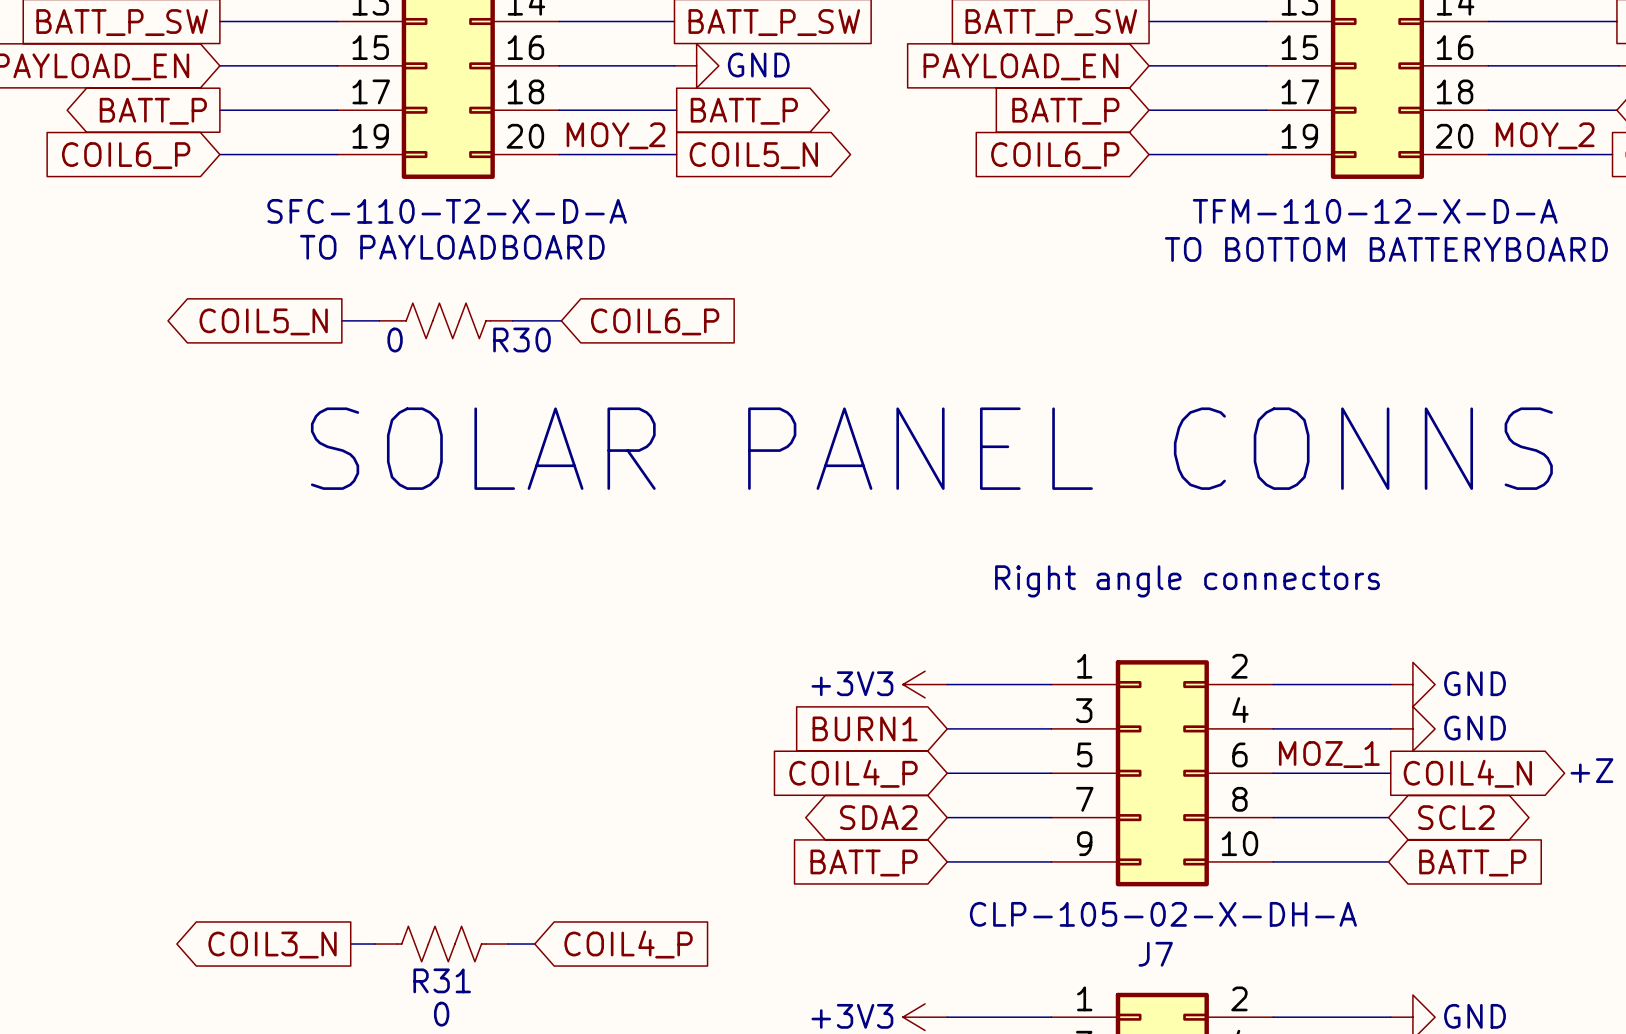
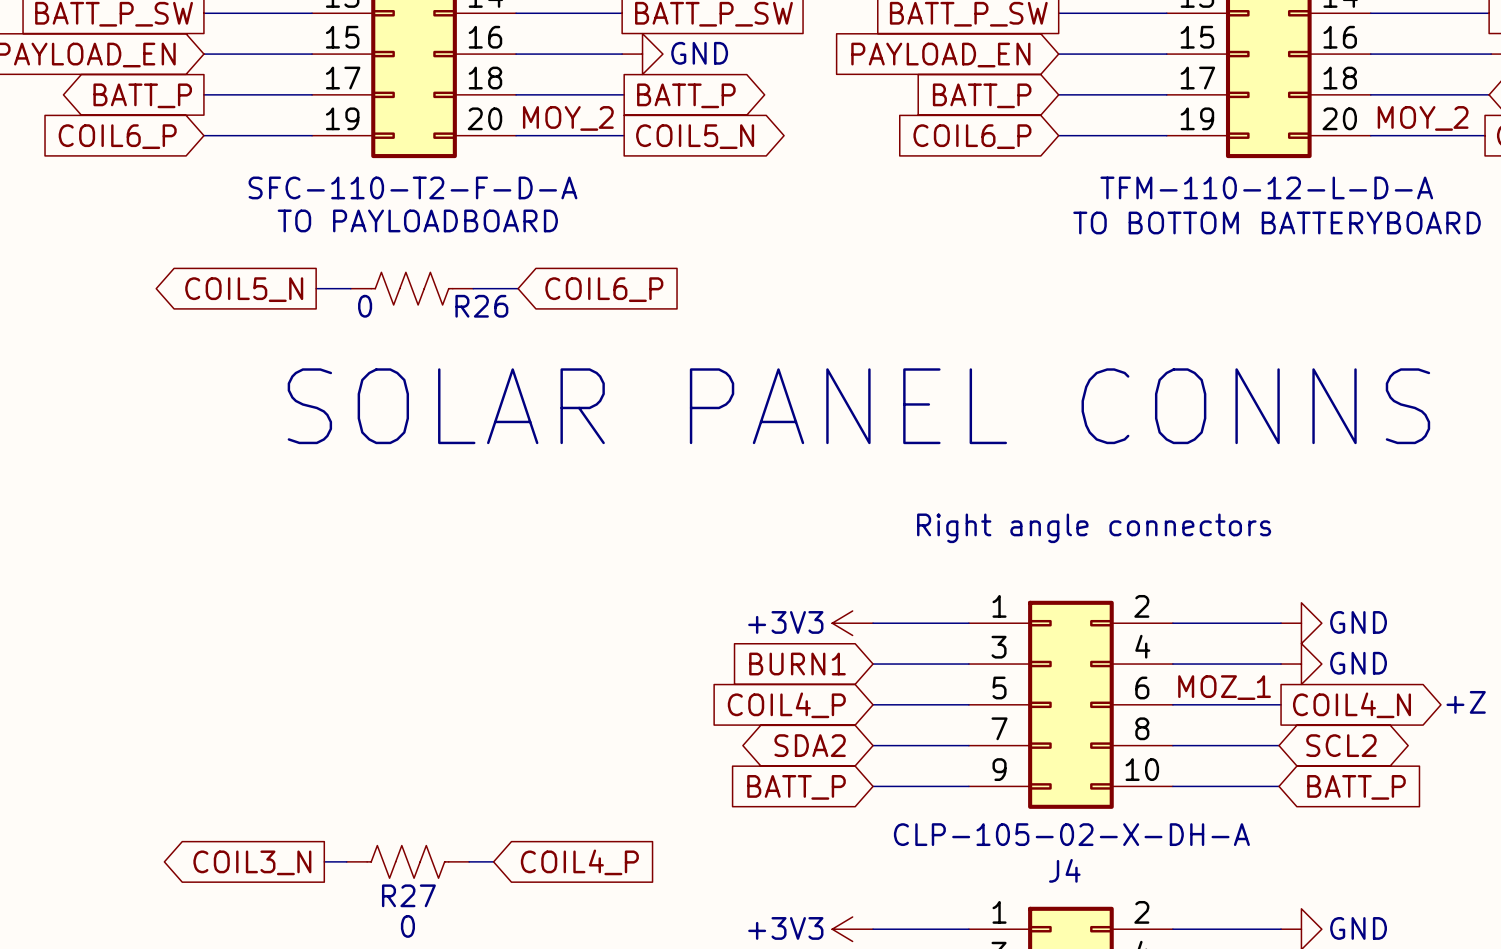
part value: SFC-110-T2-X-D-A (447, 211) -> SFC-110-T2-F-D-A (412, 187)
part value: TFM-110-12-X-D-A (1375, 211) -> TFM-110-12-L-D-A (1266, 187)
R30 name: R30 (522, 340) -> R26 (481, 306)
J7 name: J7 (1155, 954) -> J4 (1064, 870)
R31 name: R31 (442, 980) -> R27 (408, 895)

